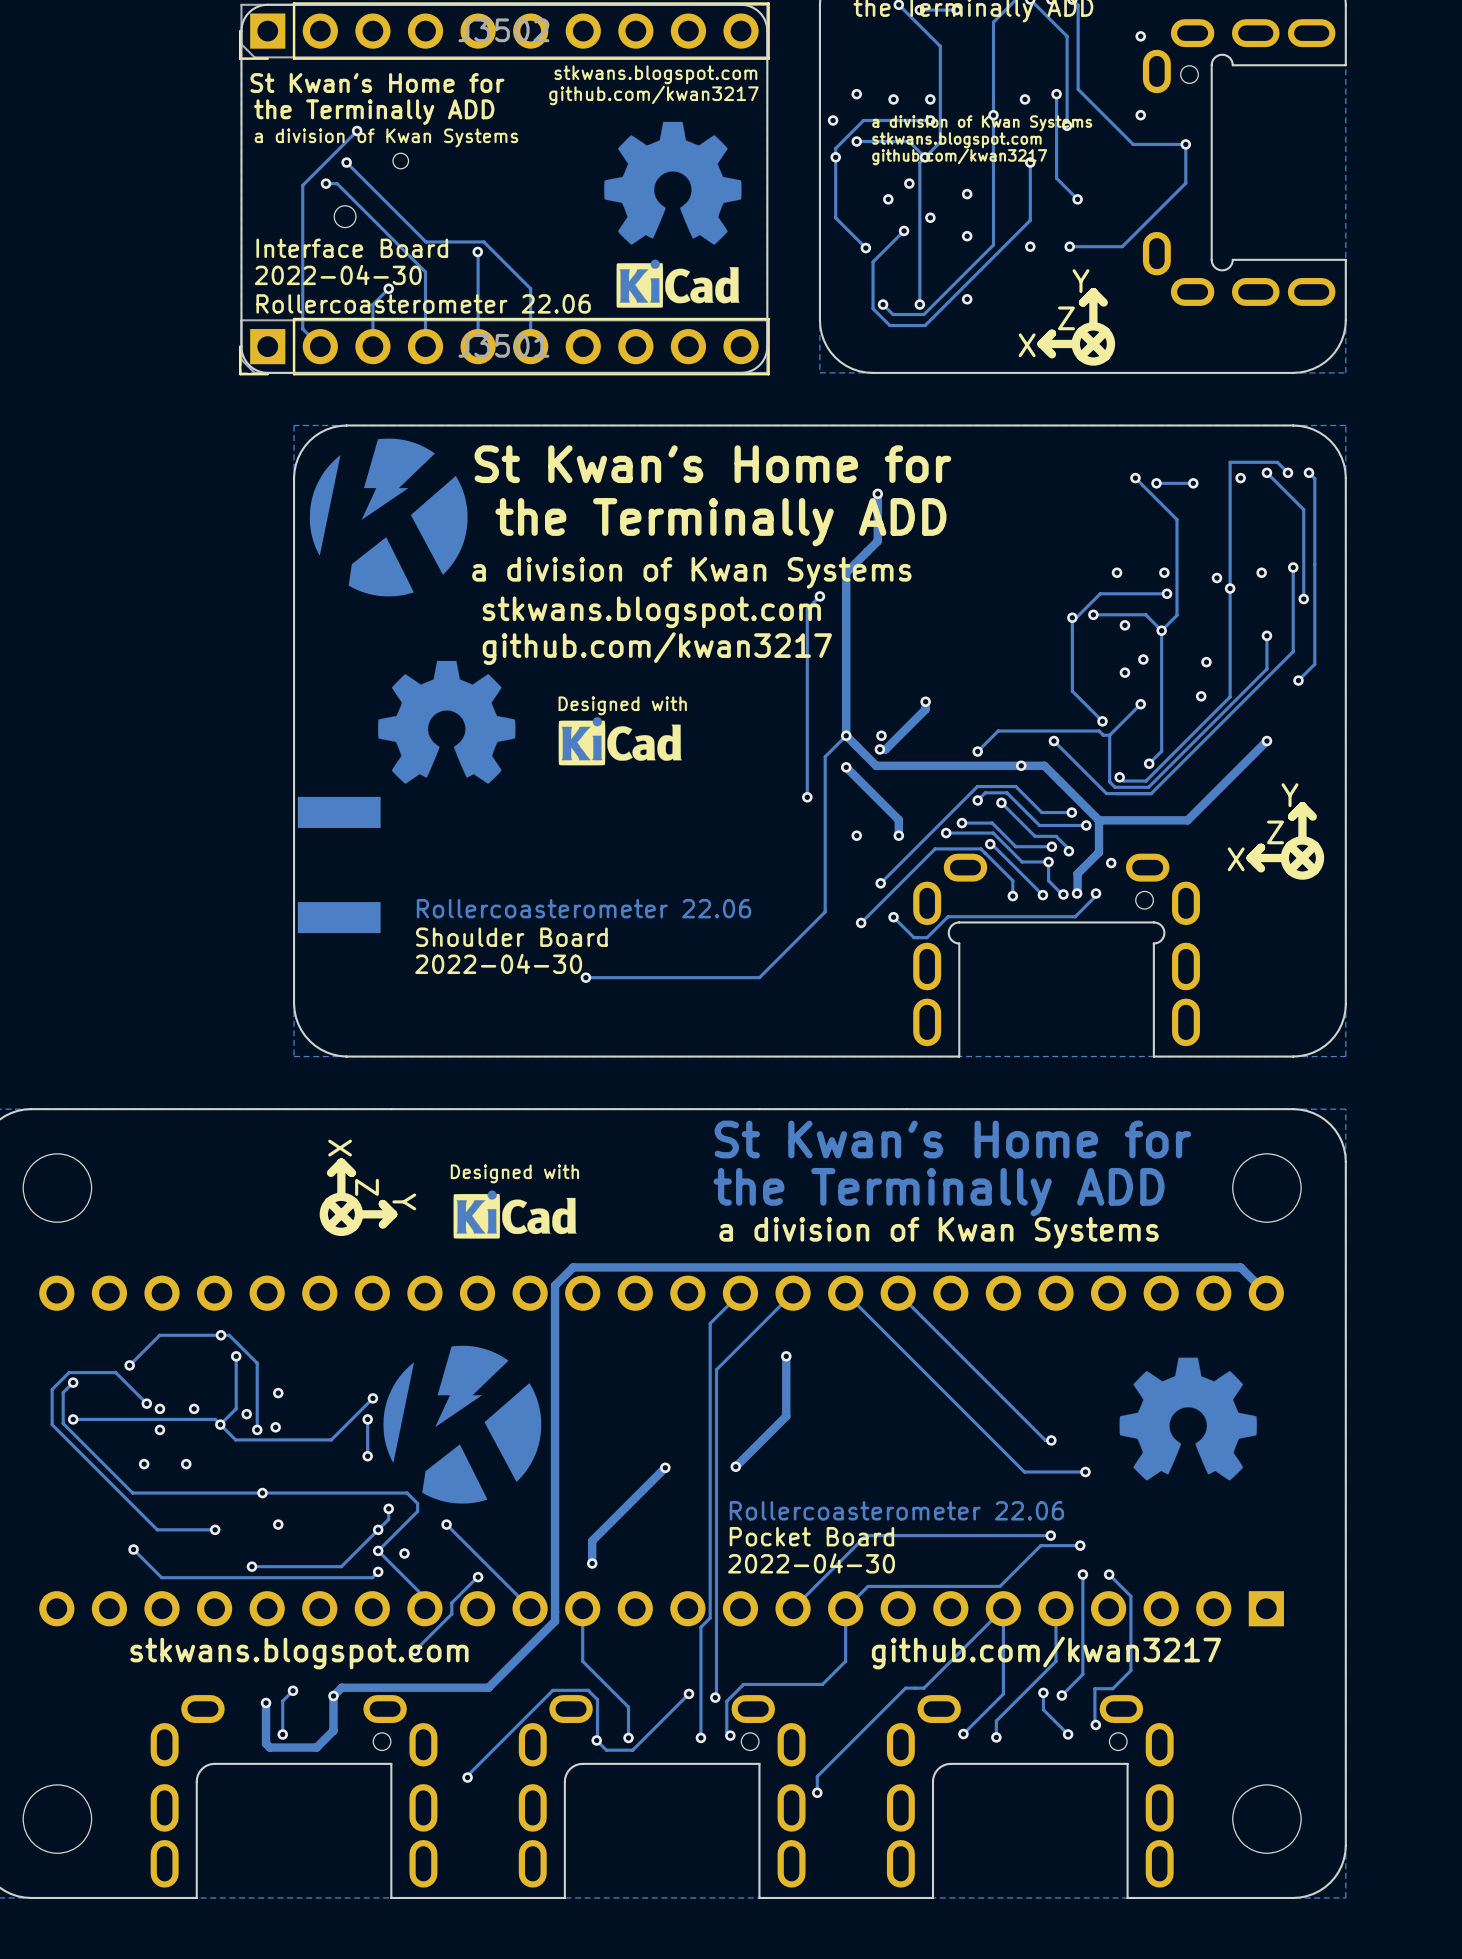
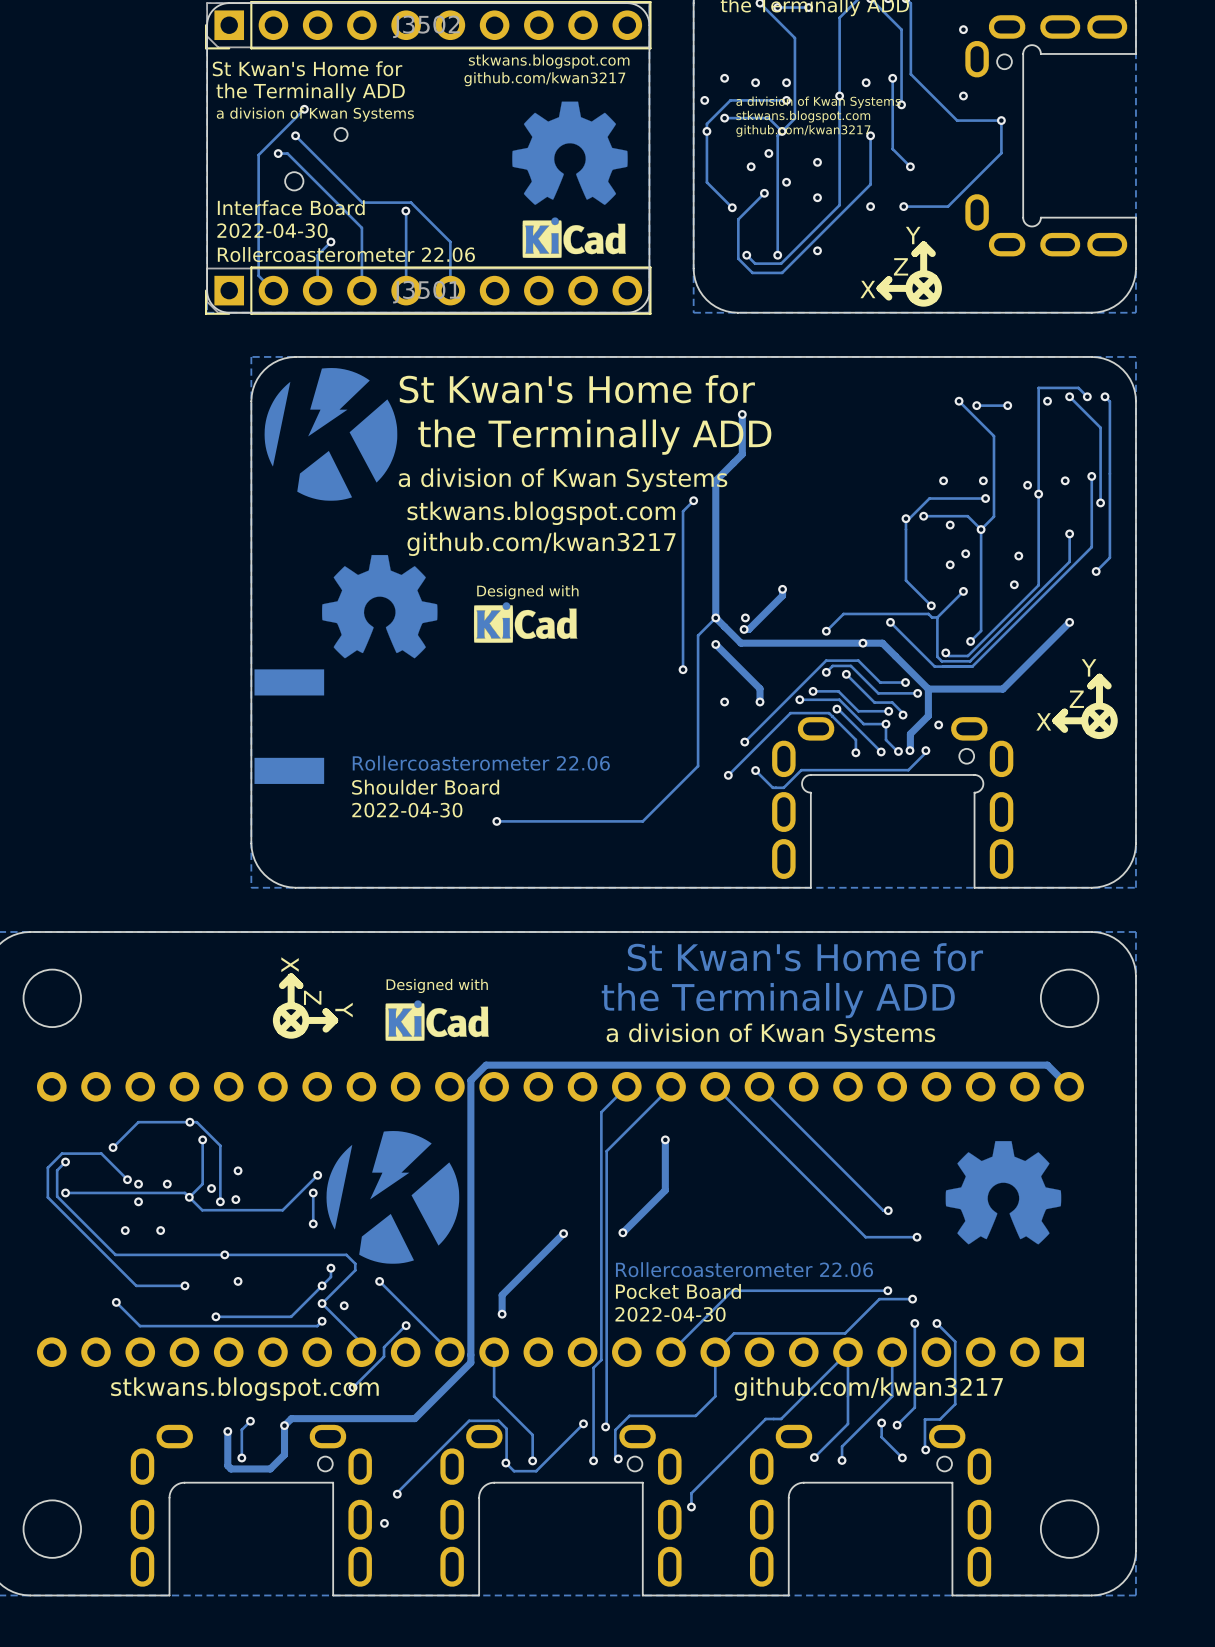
via: none -> (384, 1523)

